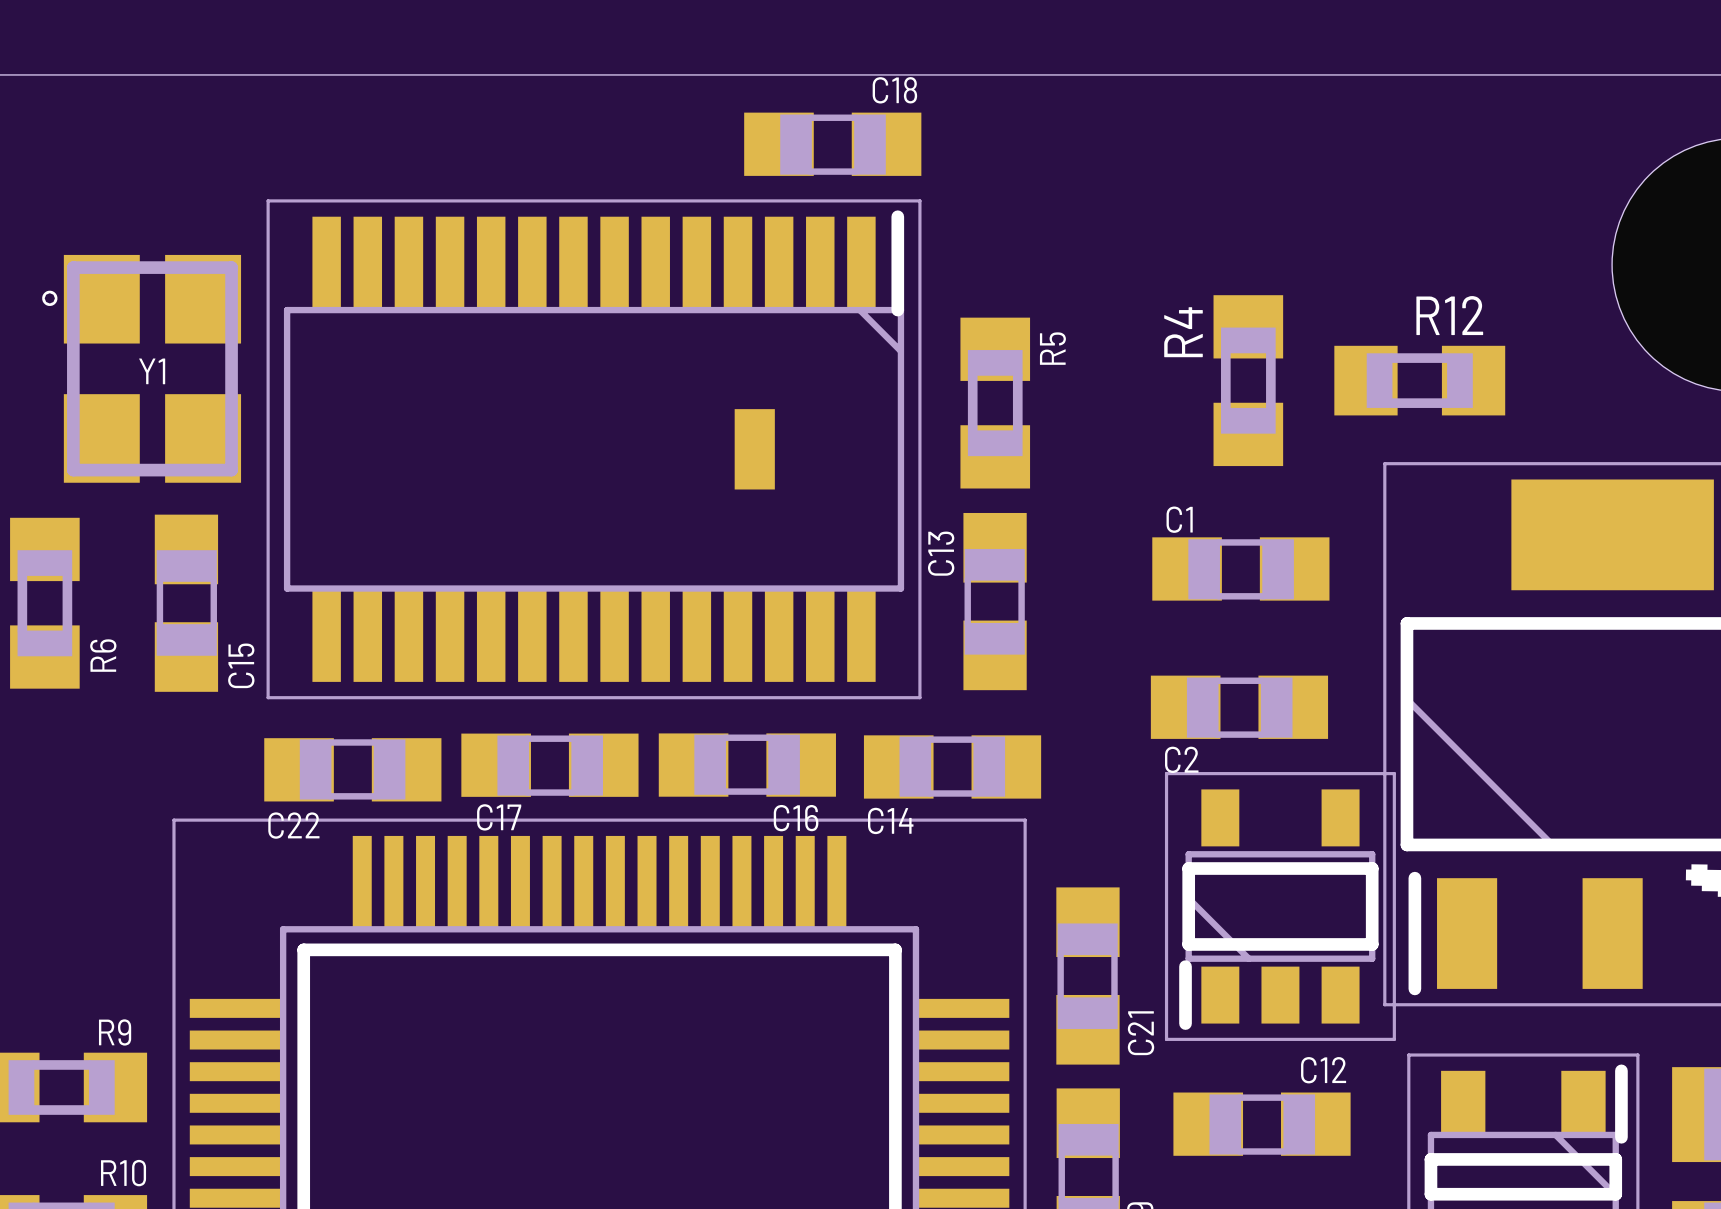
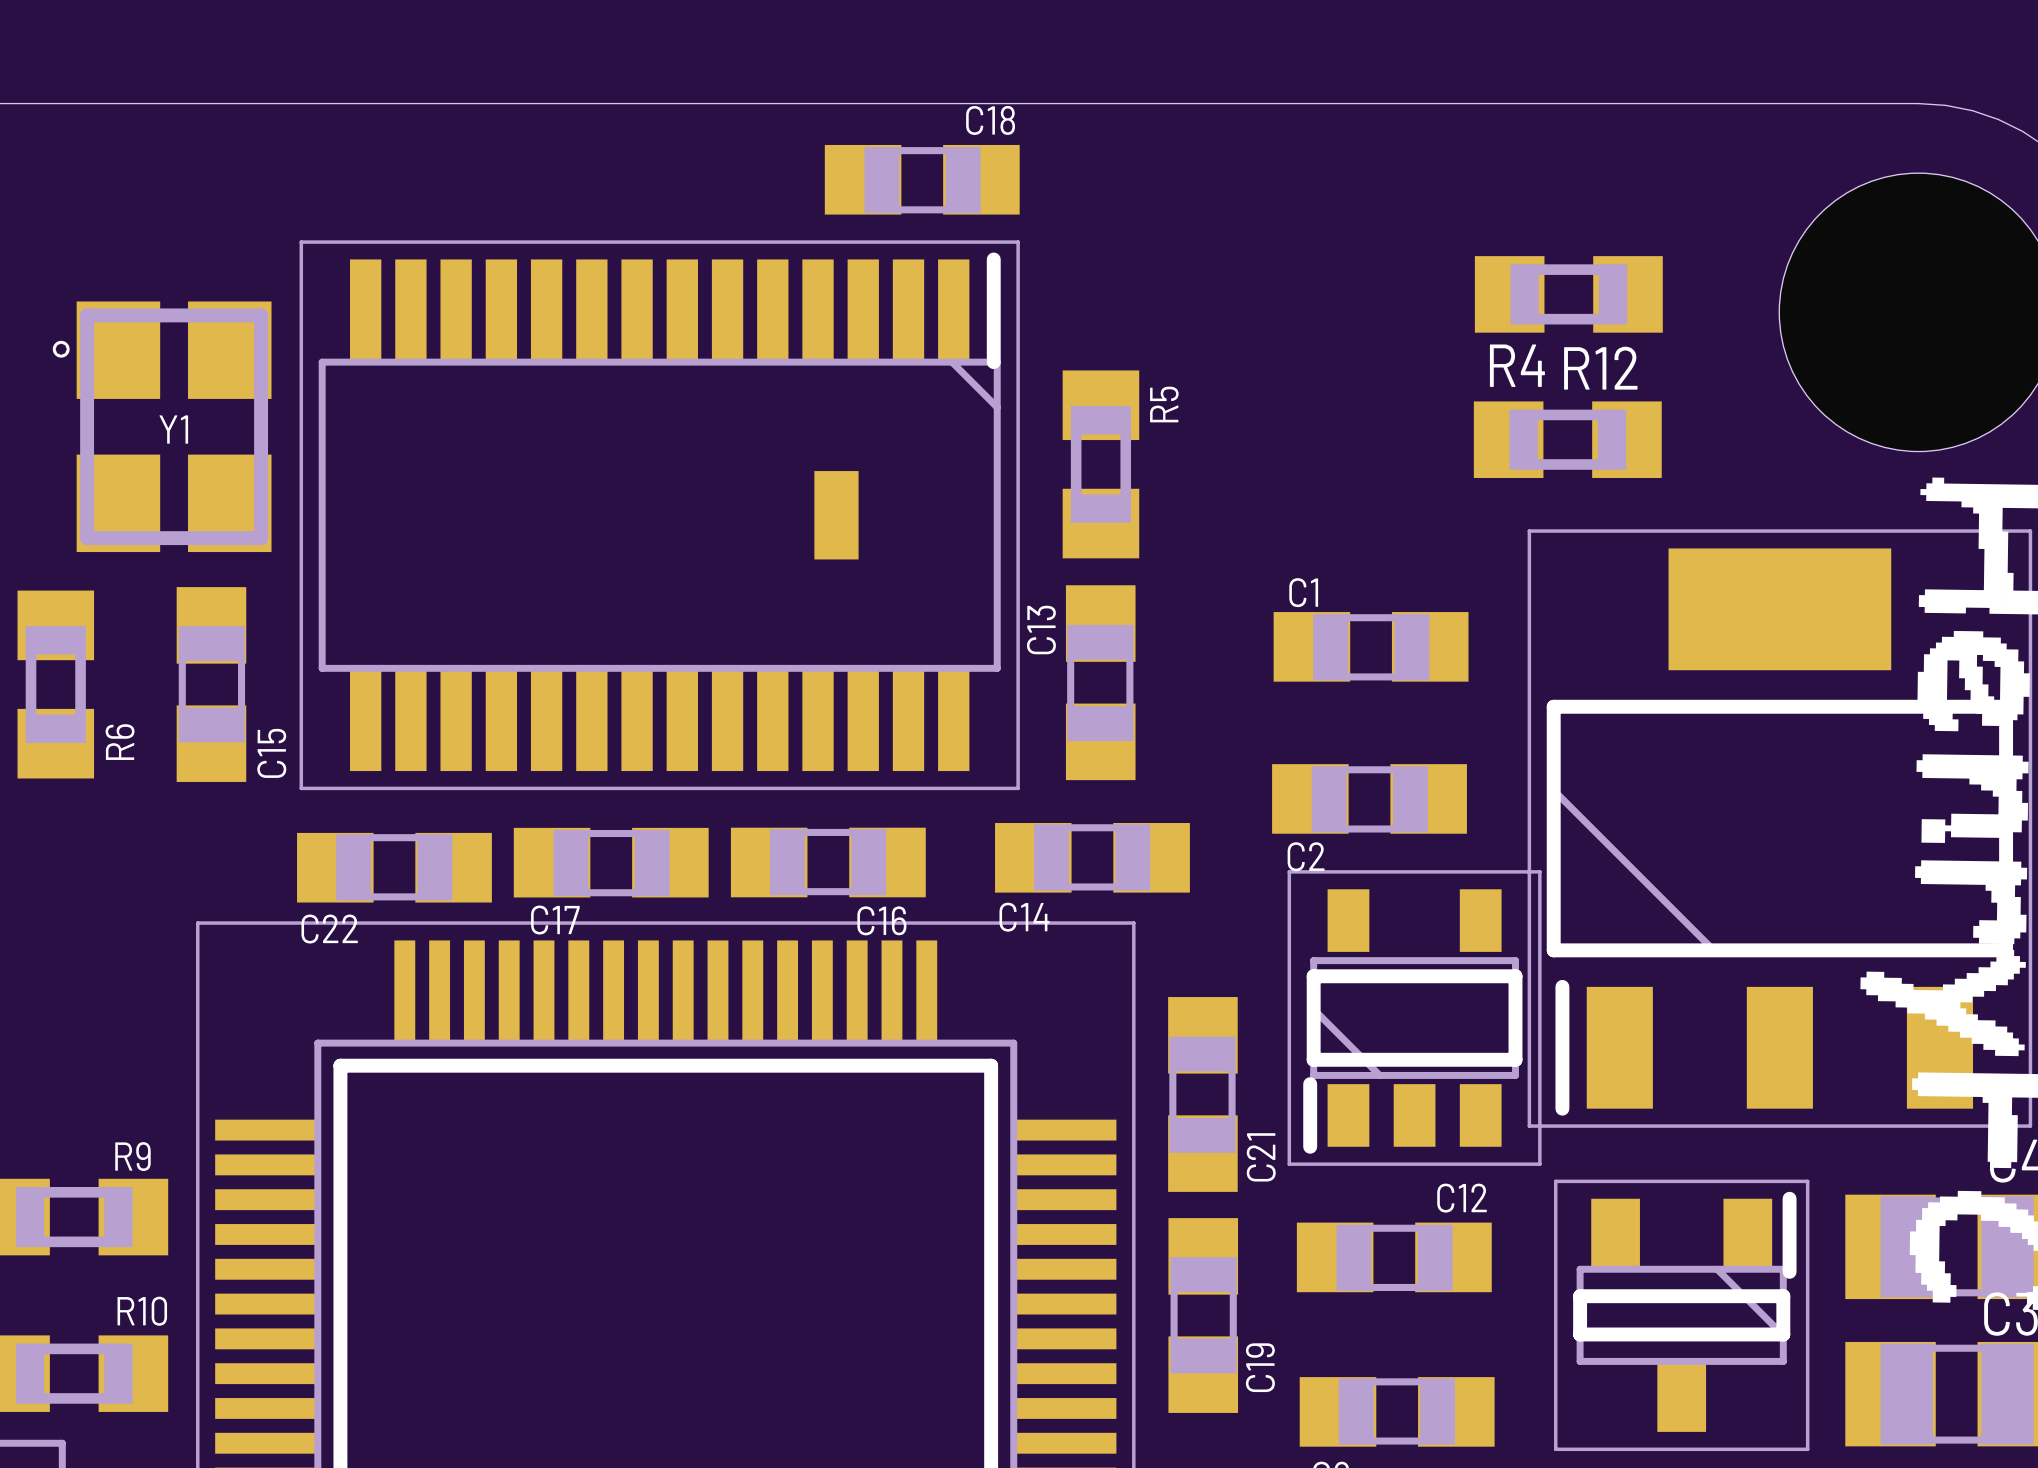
R4 name position: R4 (1183, 332) -> R4 (1517, 365)
R4 rotation: 0° (1248, 380) -> 90° clockwise (1568, 294)
R4 position: (1248, 380) -> (1568, 294)
C14 position: (952, 766) -> (1092, 857)

